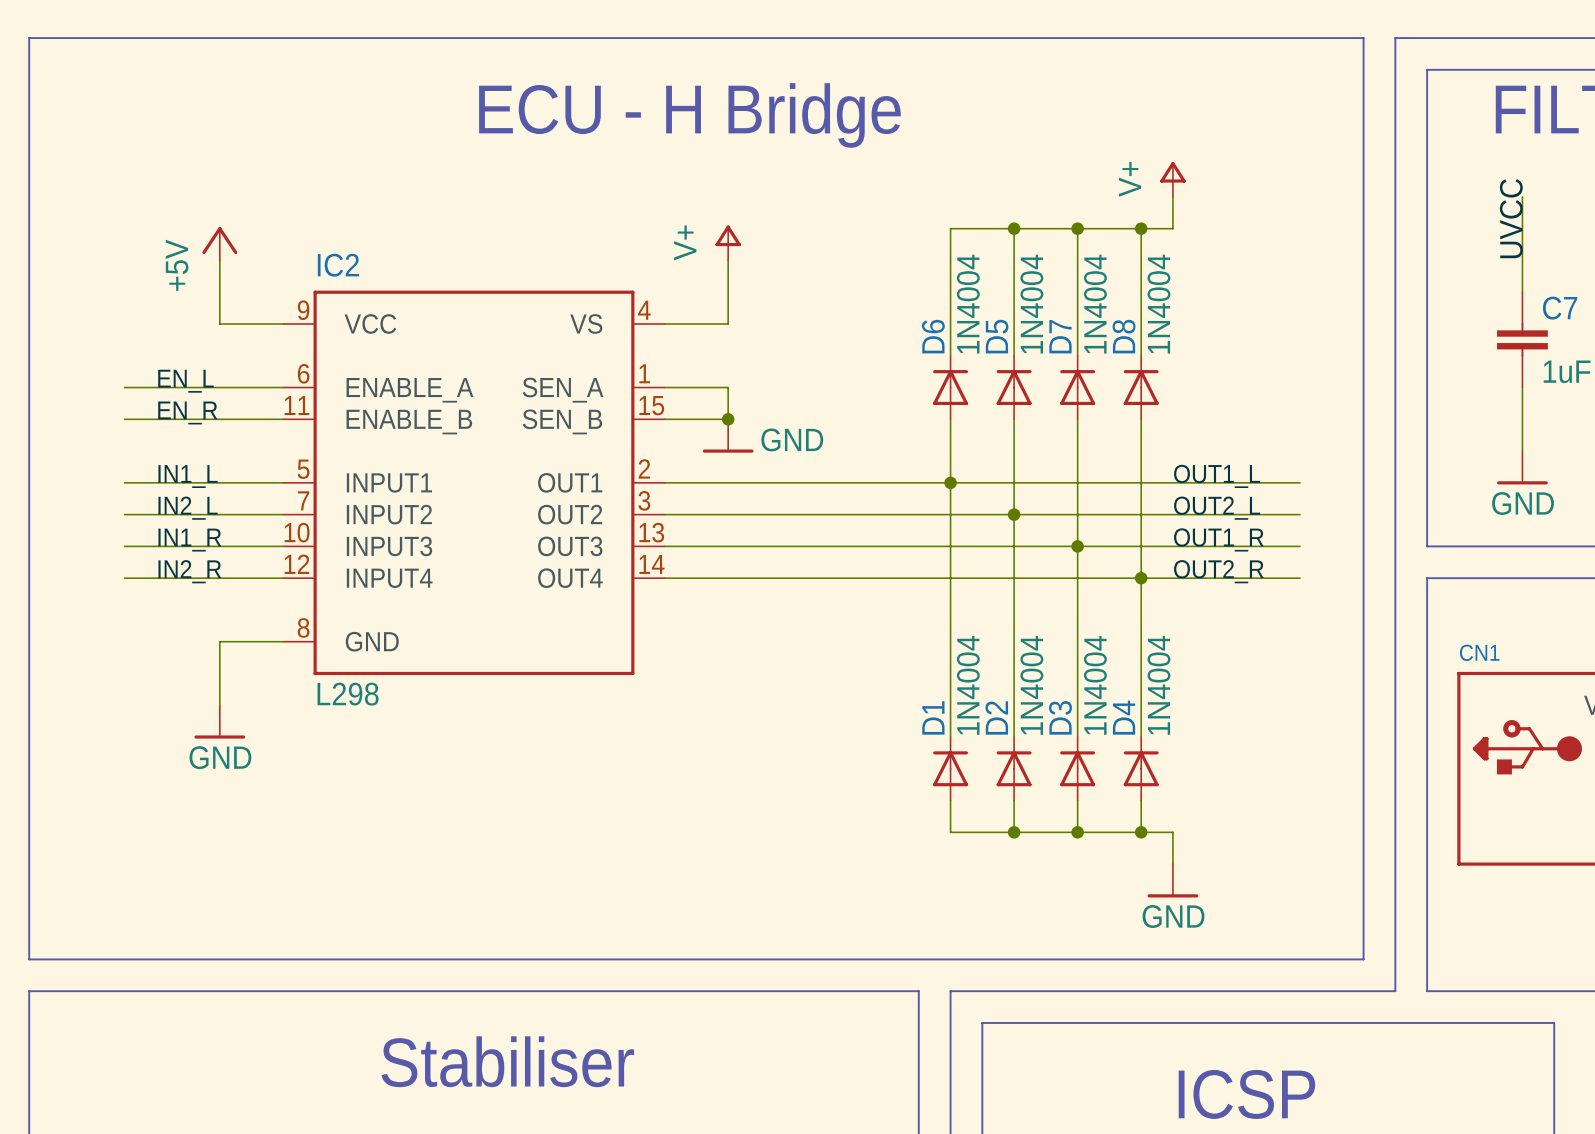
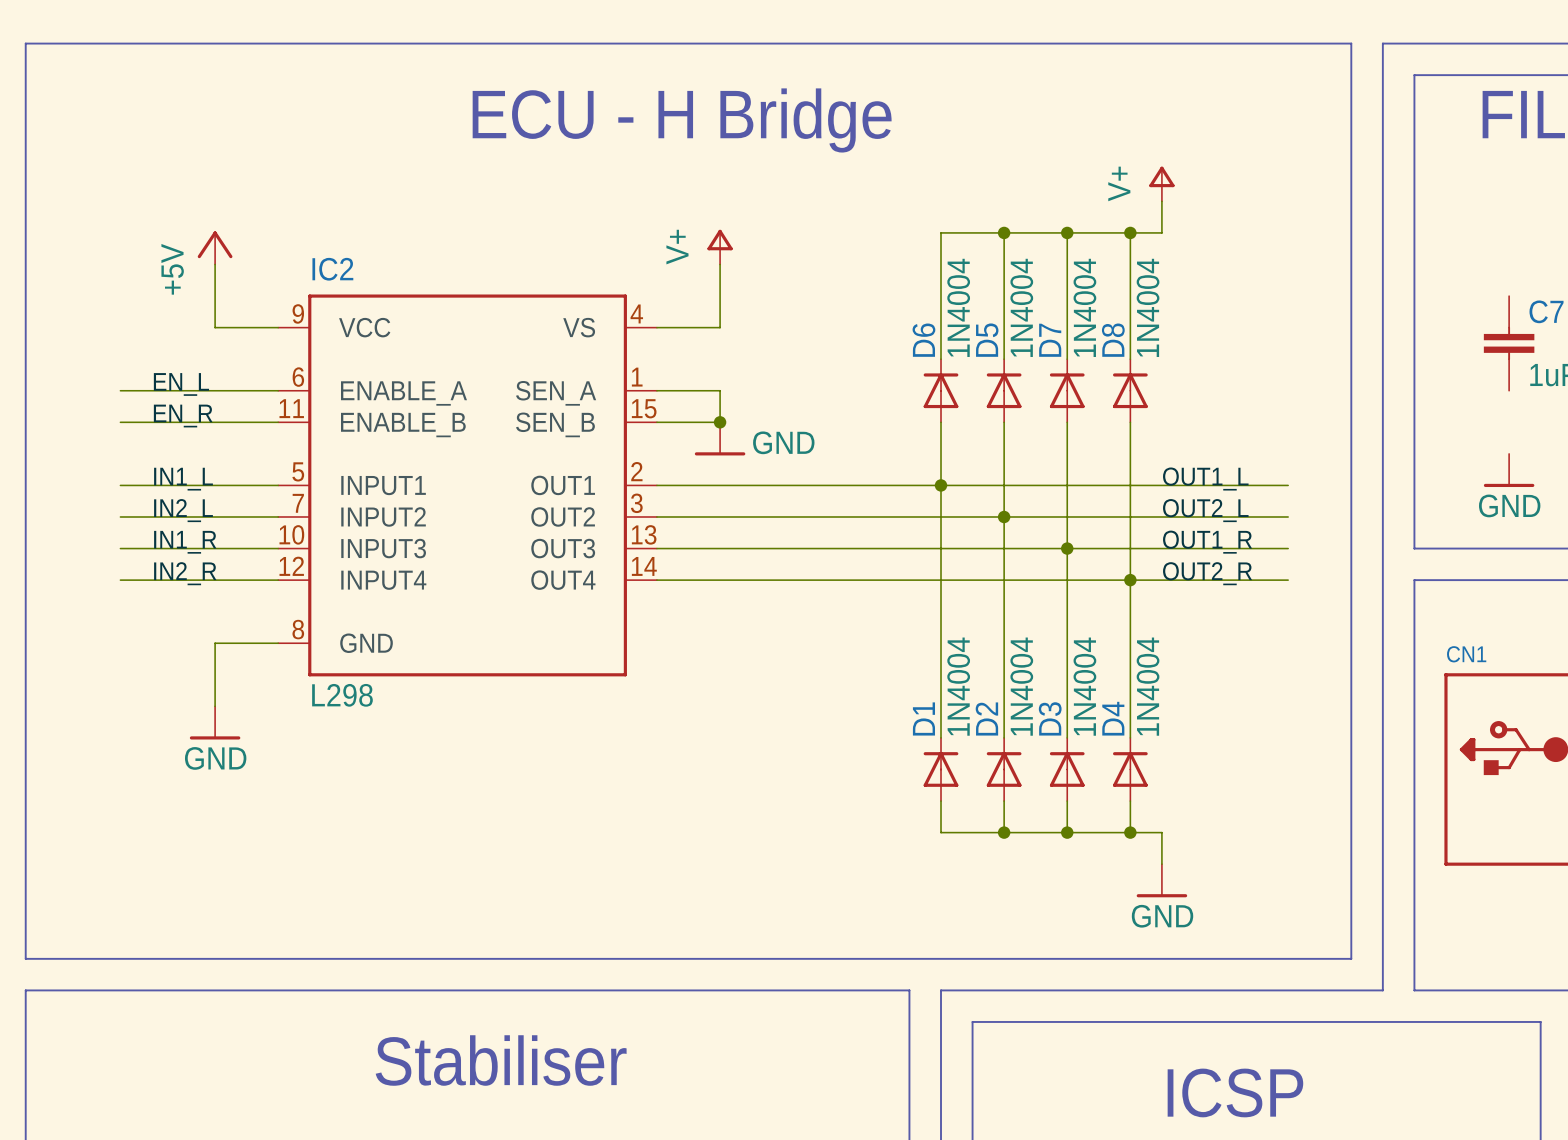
wire: (1522, 196) (1522, 292) -> none
label: UVCC (1511, 218) -> none
wire: (1522, 387) (1522, 451) -> none

